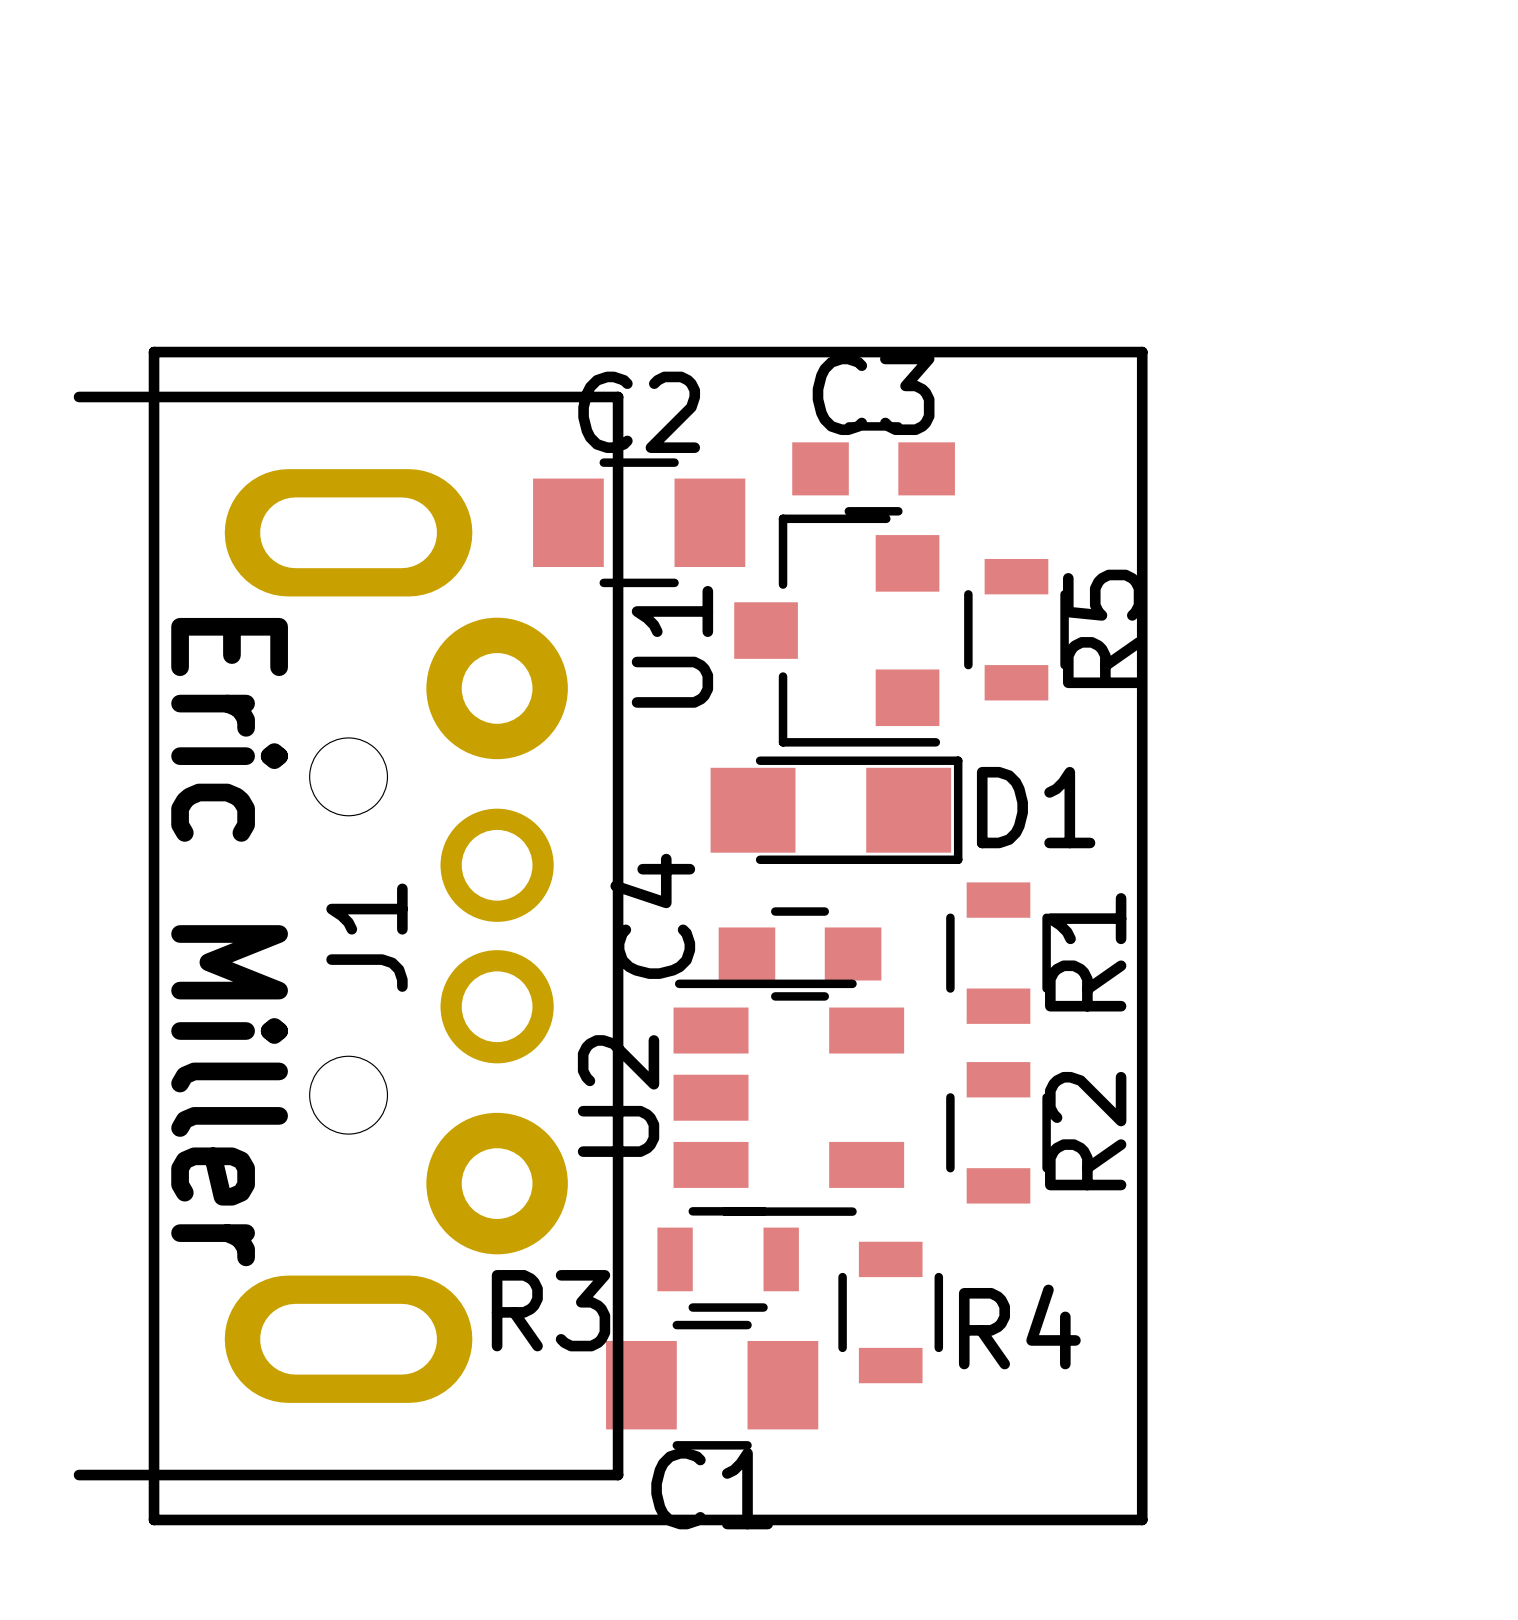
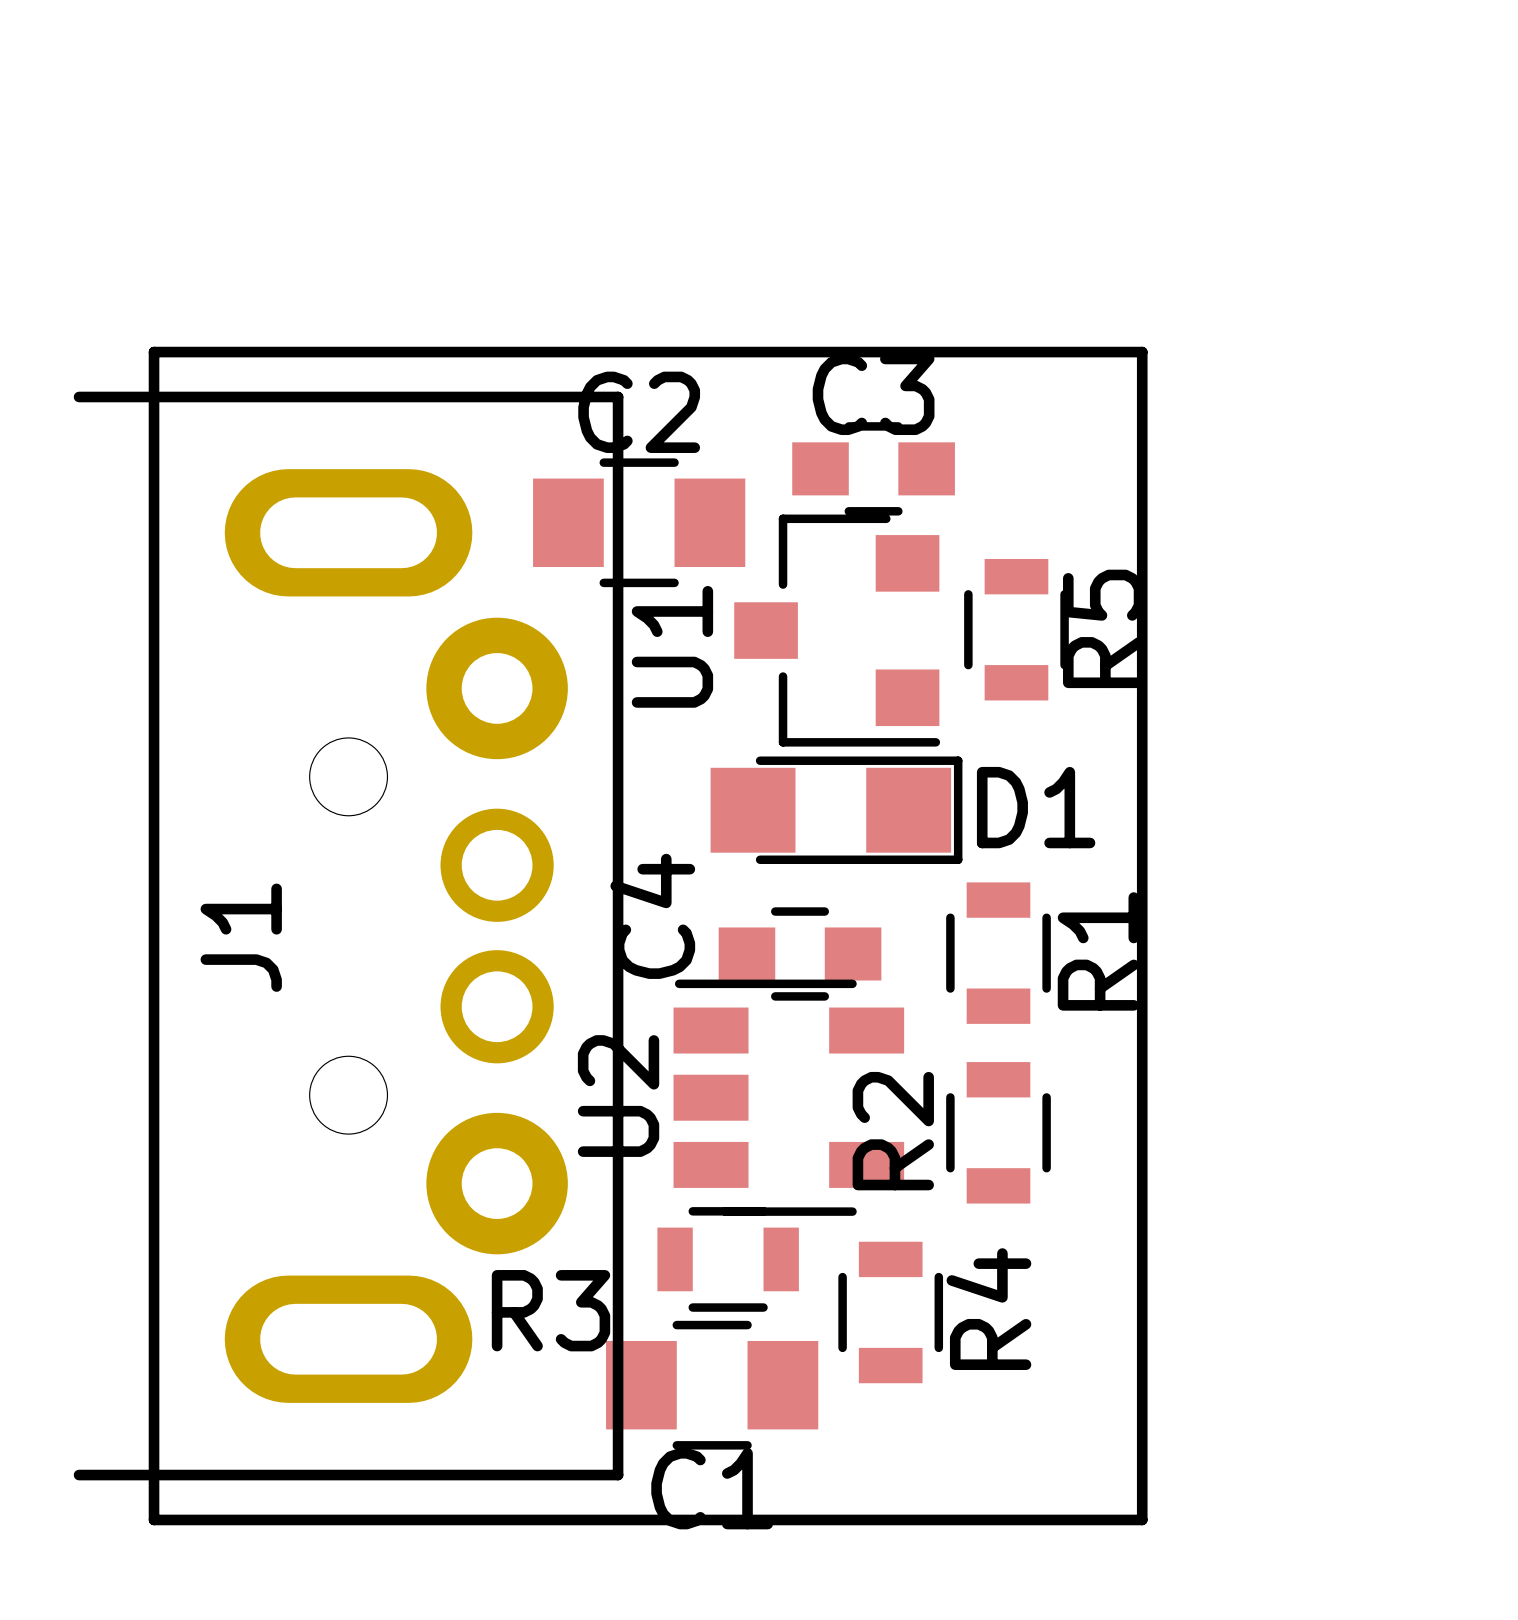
J1 name position: J1 (366, 937) -> J1 (241, 937)
text: Eric Miller (229, 942) -> none
R1 name position: R1 (1085, 952) -> R1 (1098, 951)
R2 name position: R2 (1085, 1131) -> R2 (893, 1131)
R4 name rotation: 0° (1019, 1326) -> 90° counterclockwise (988, 1309)

